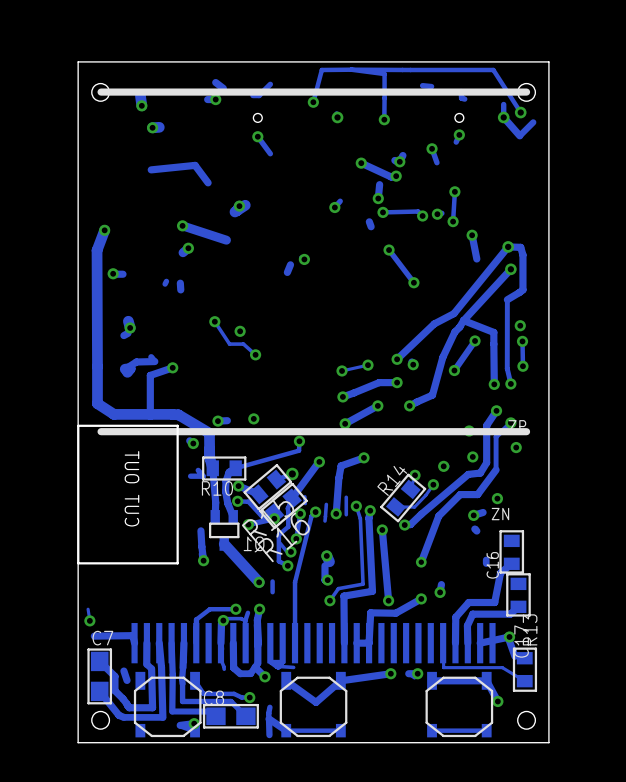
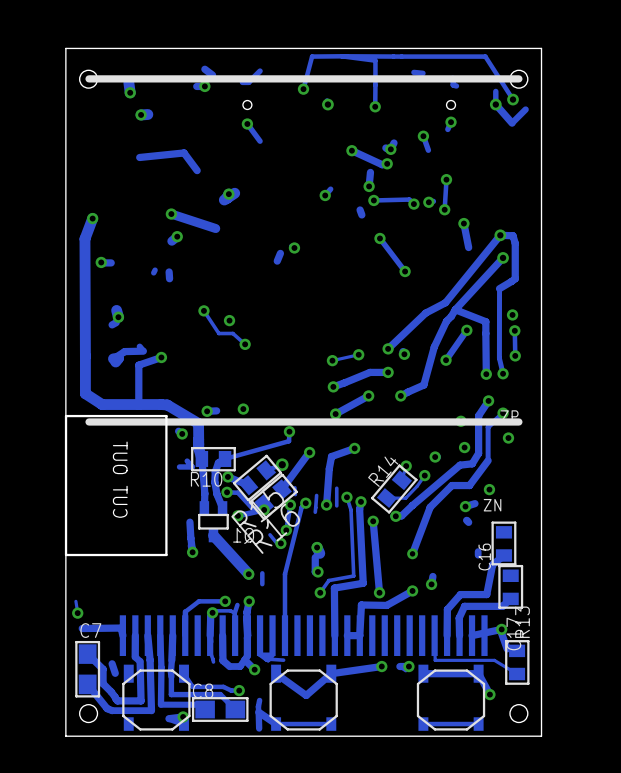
track: (292, 498) (287, 508) (288, 526) (278, 534) (278, 561) (287, 565) -> none
via: (287, 565) -> none

